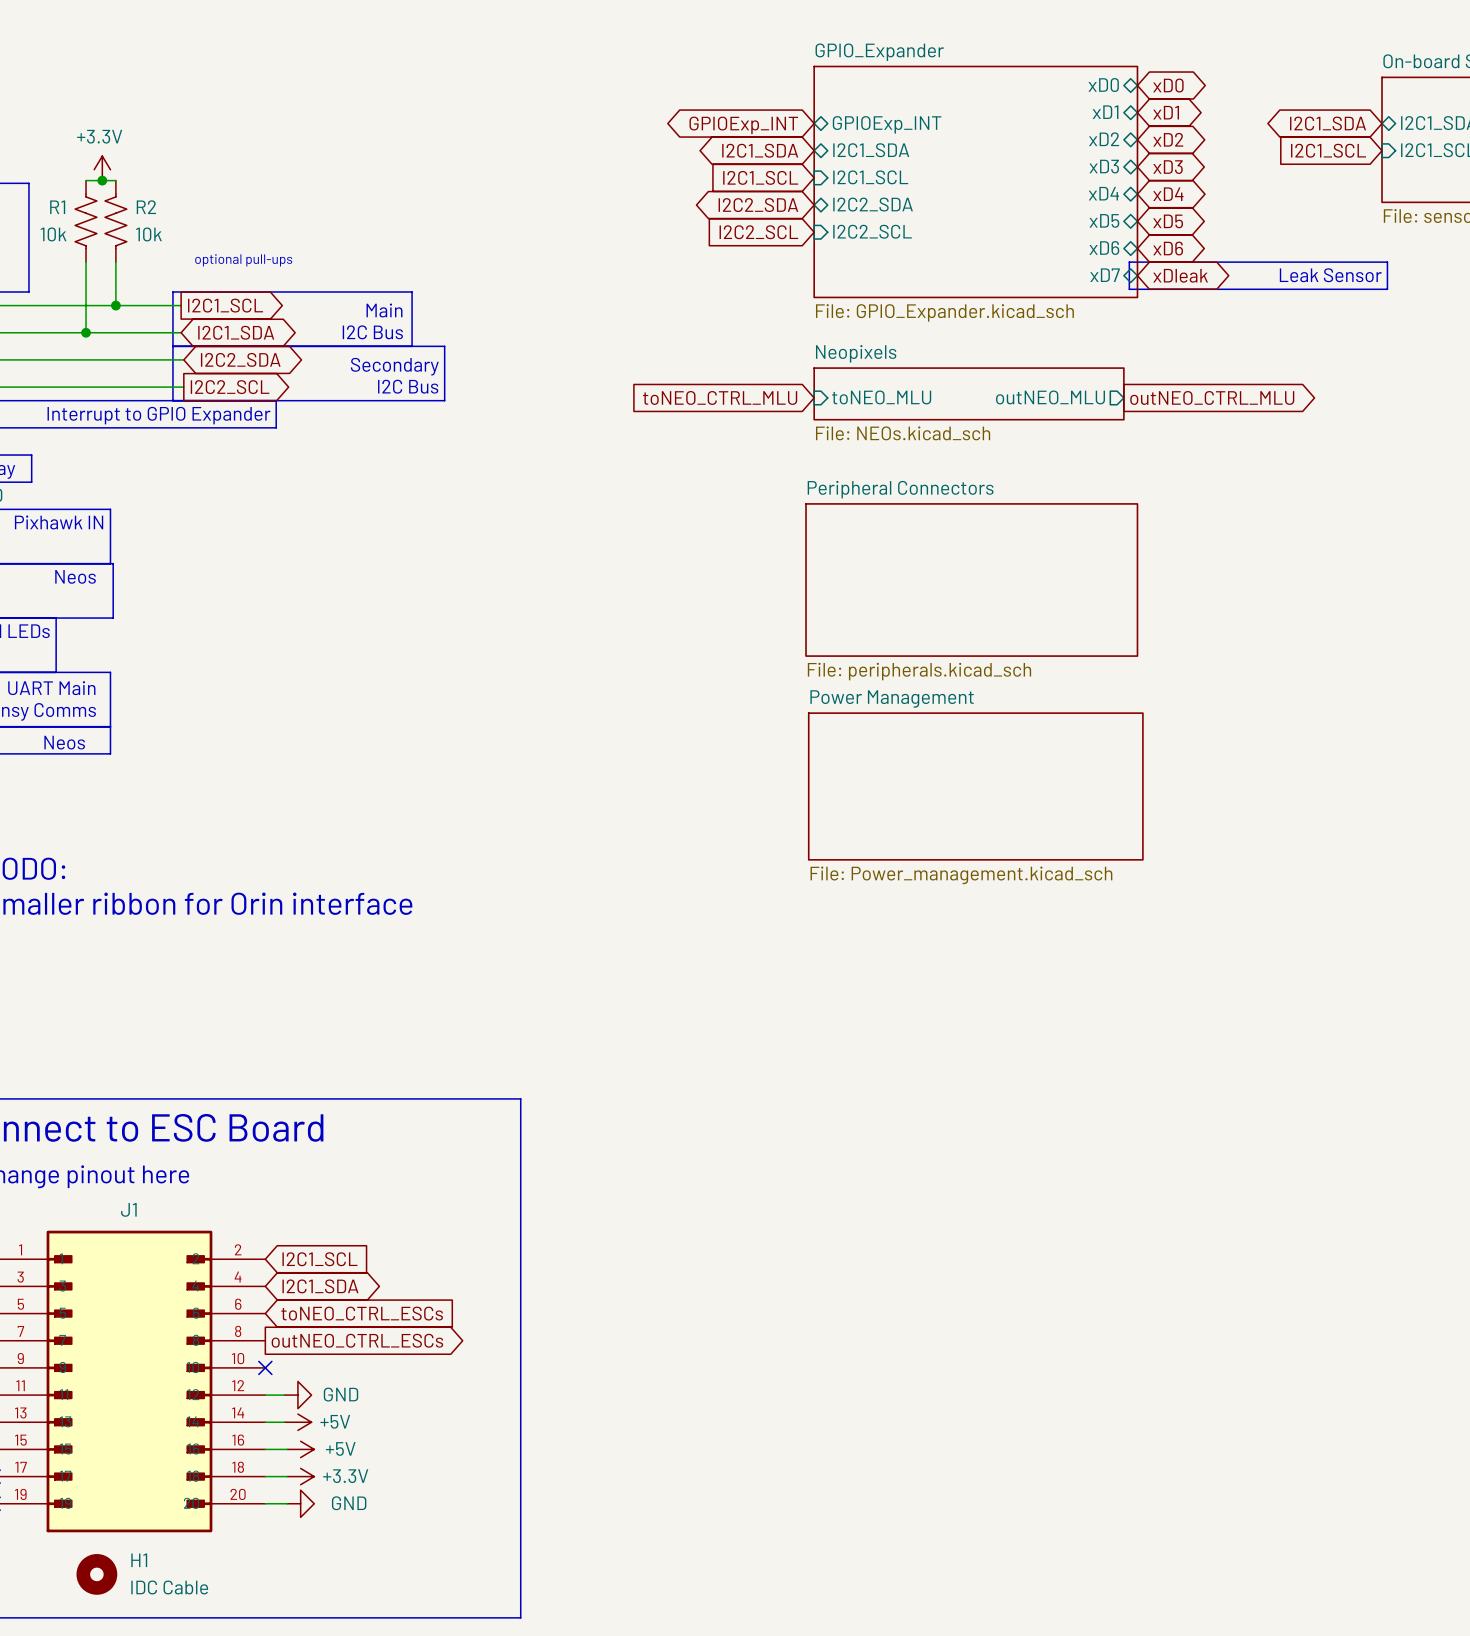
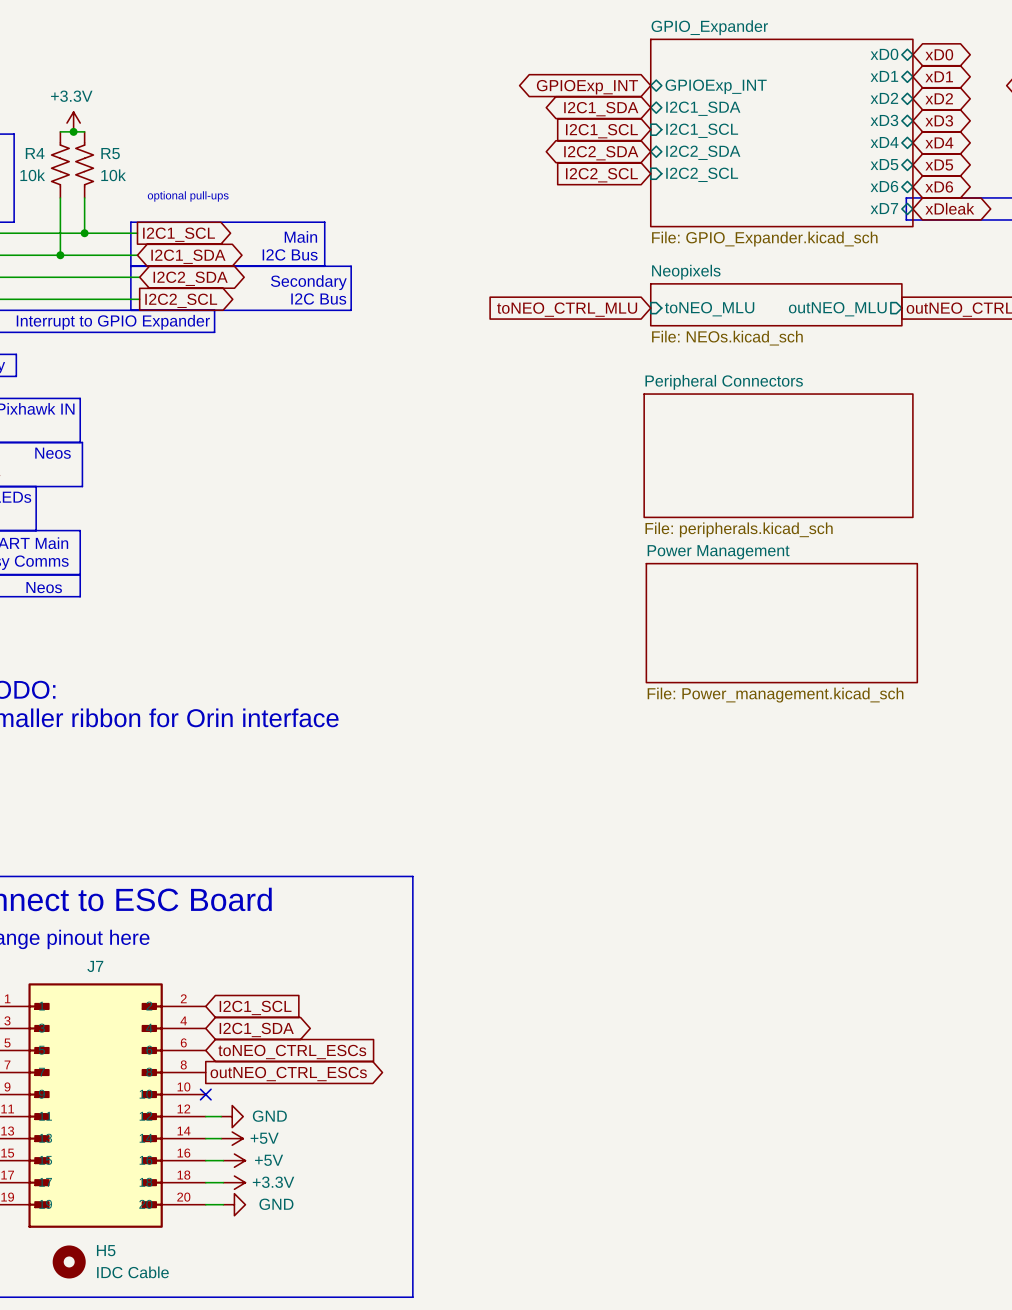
R1 name: R1 (57, 207) -> R4 (35, 153)
R2 name: R2 (146, 207) -> R5 (110, 153)
J1 name: J1 (128, 1209) -> J7 (95, 966)
H1 name: H1 (139, 1560) -> H5 (106, 1250)

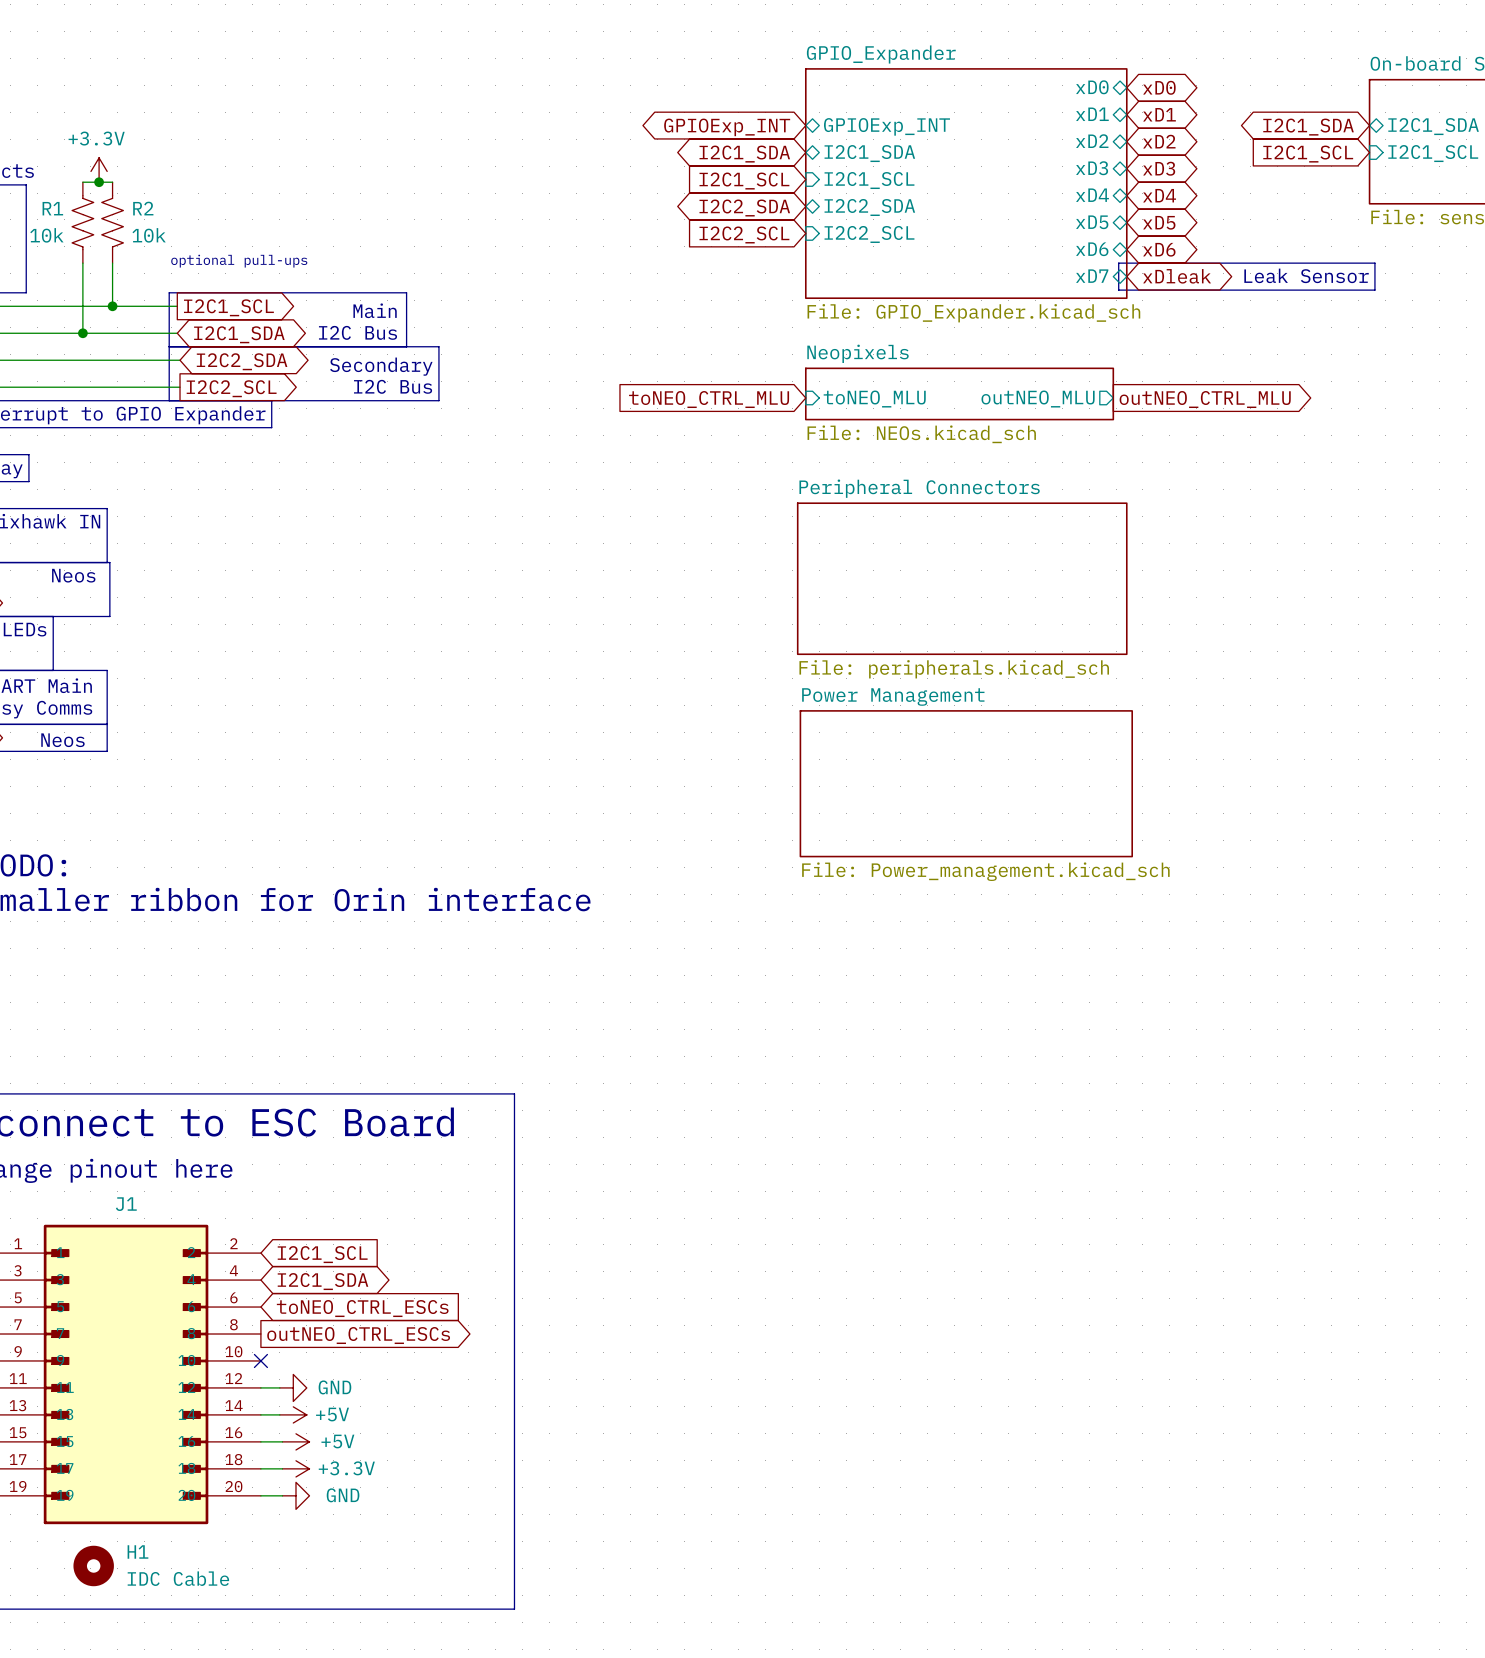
R4 name: R4 (35, 153) -> R1 (52, 208)
R5 name: R5 (110, 153) -> R2 (143, 208)
J7 name: J7 (95, 966) -> J1 (126, 1204)
H5 name: H5 (106, 1250) -> H1 (137, 1551)

